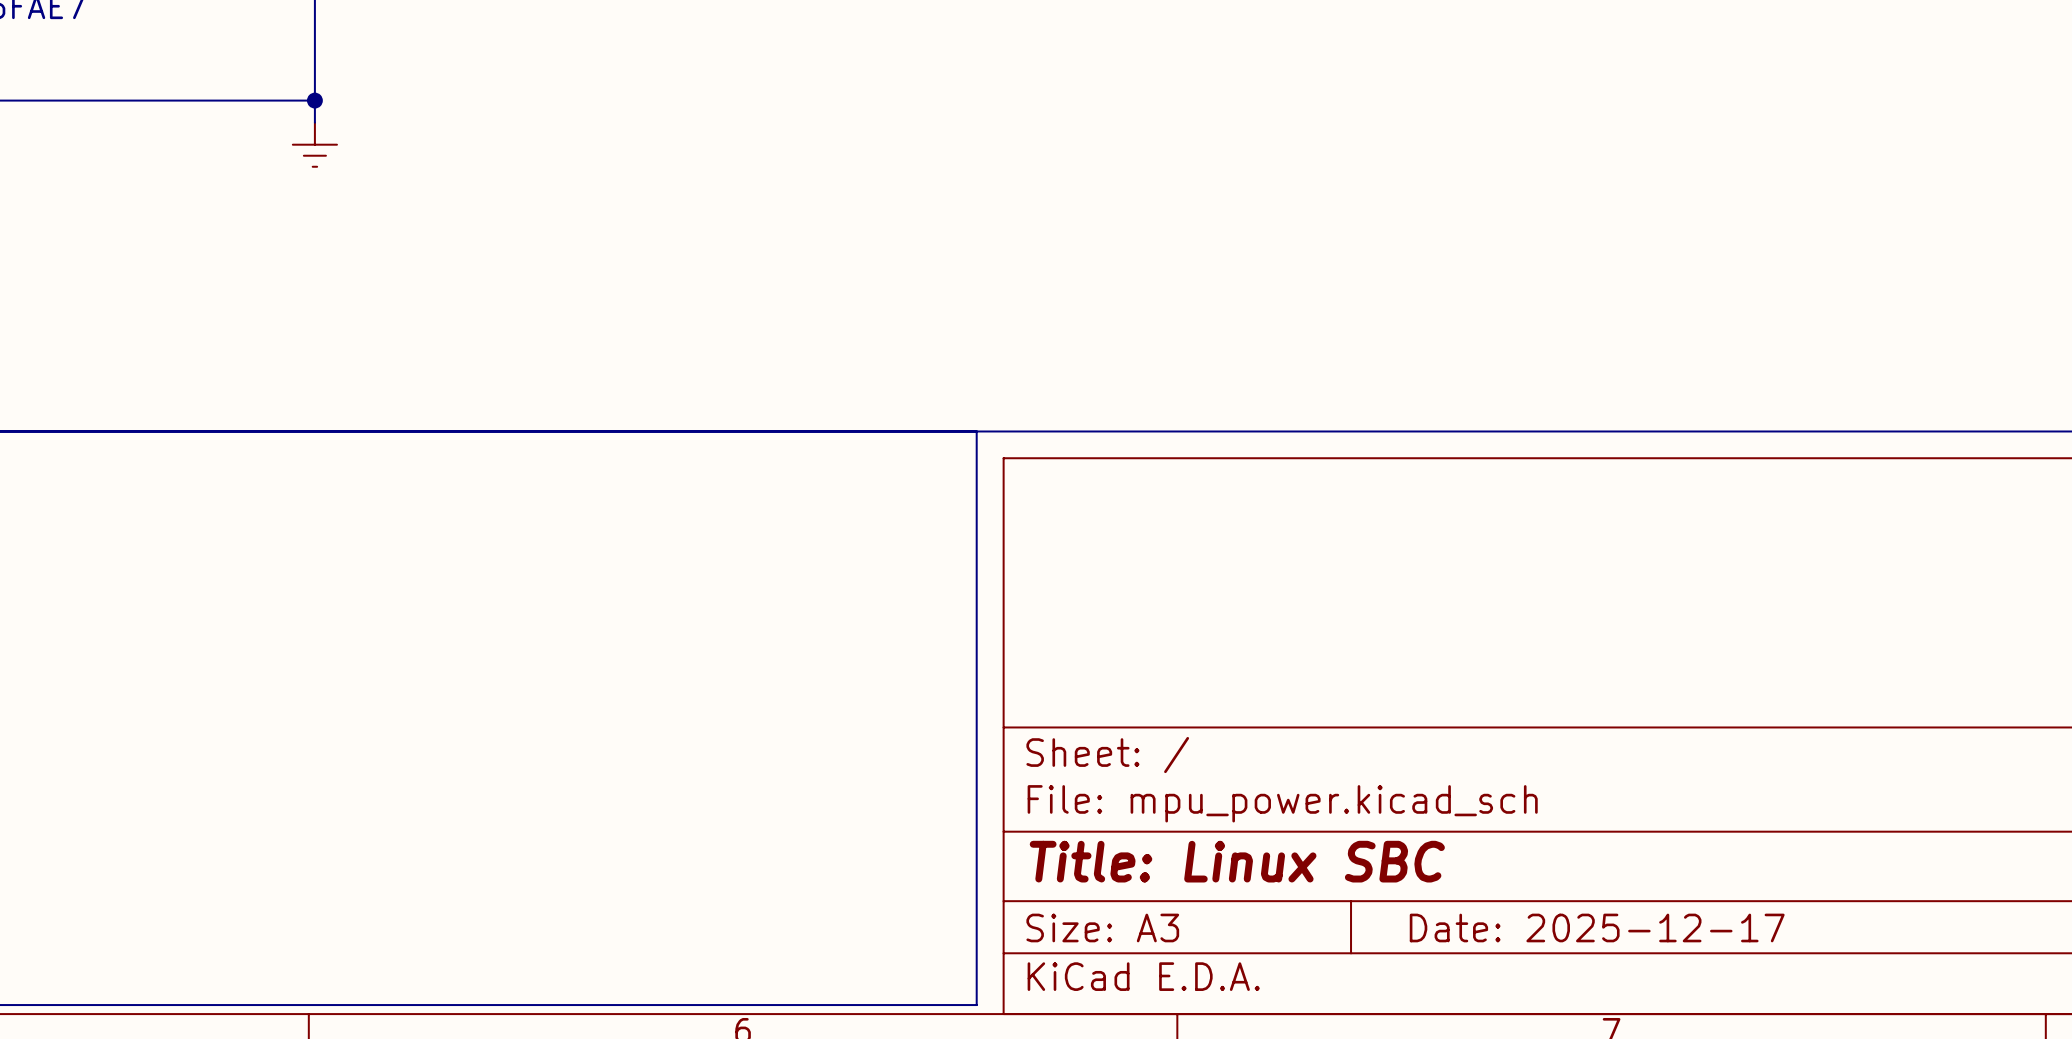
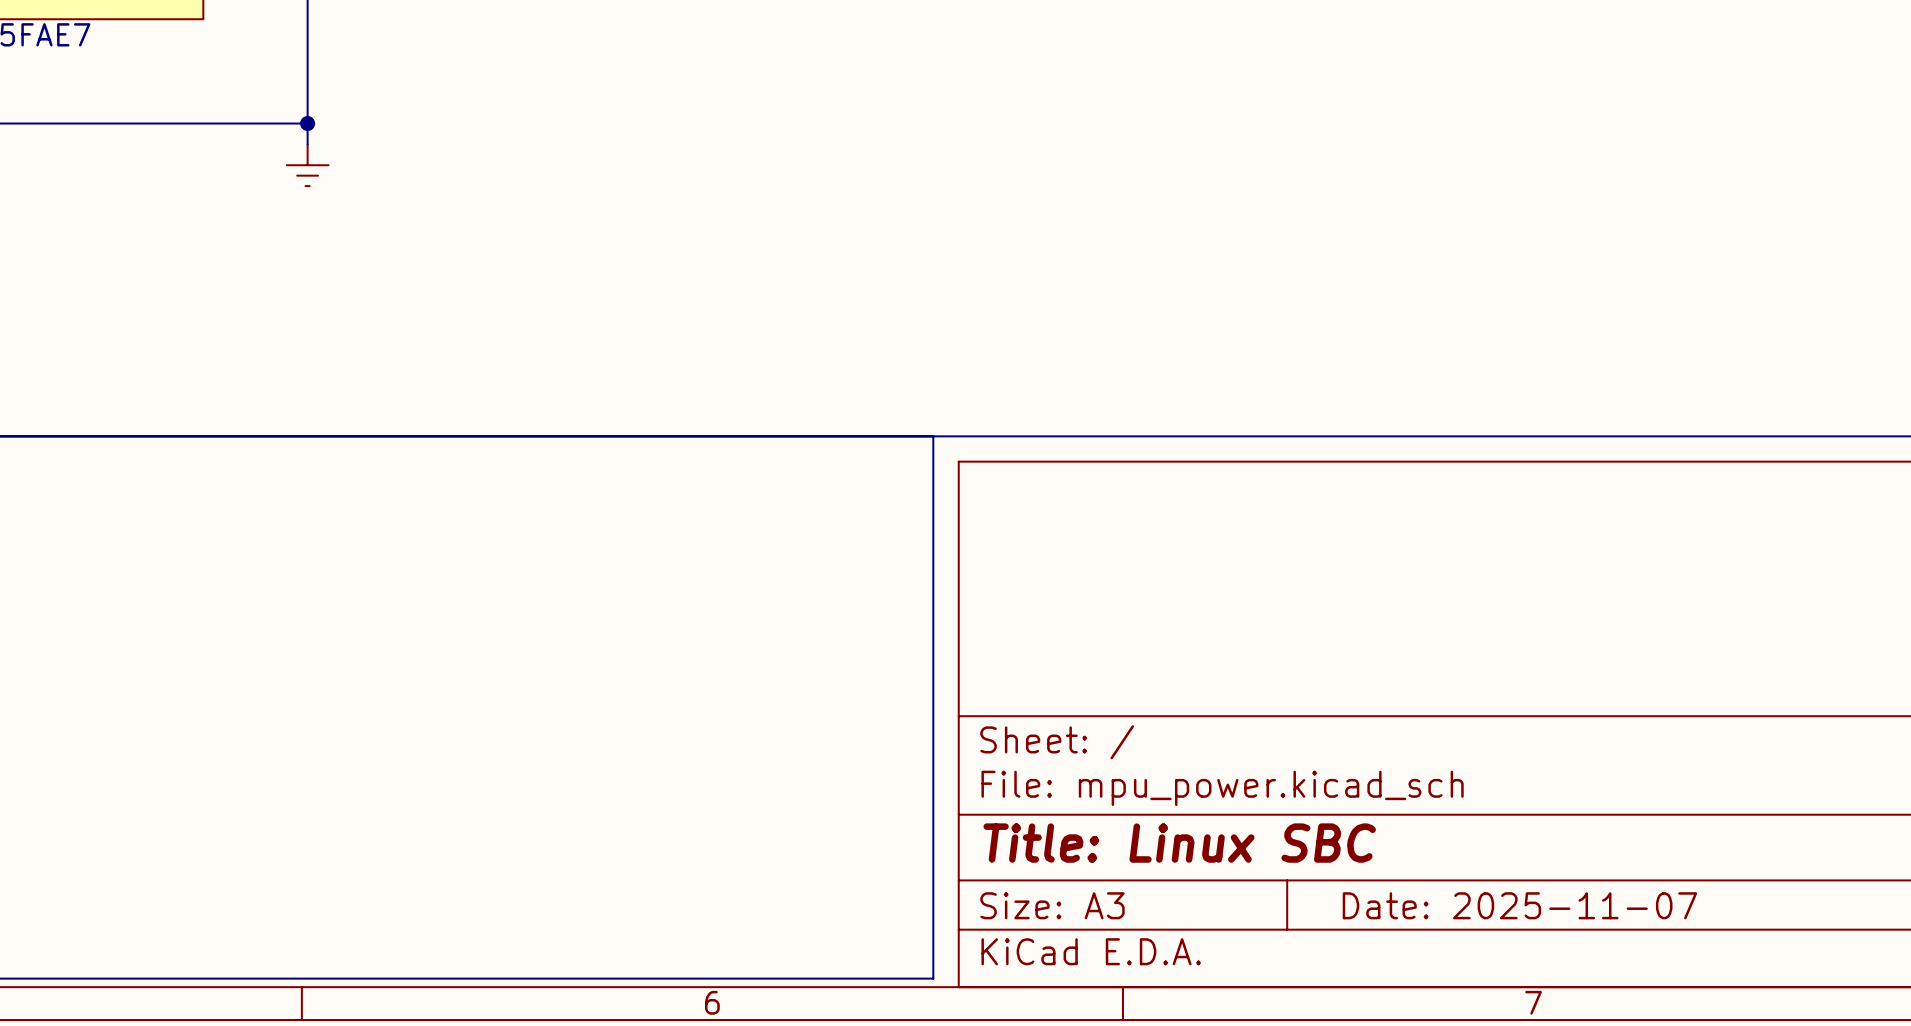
title block: Date: 2025-12-17 (1597, 927) -> Date: 2025-11-07 (1519, 905)

